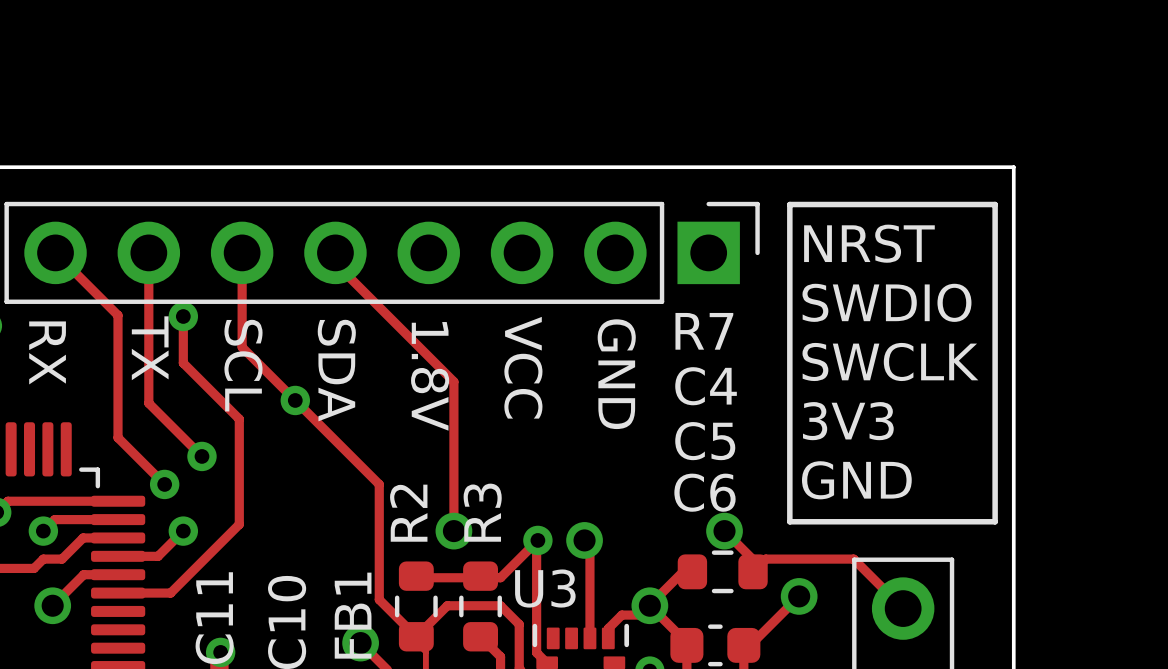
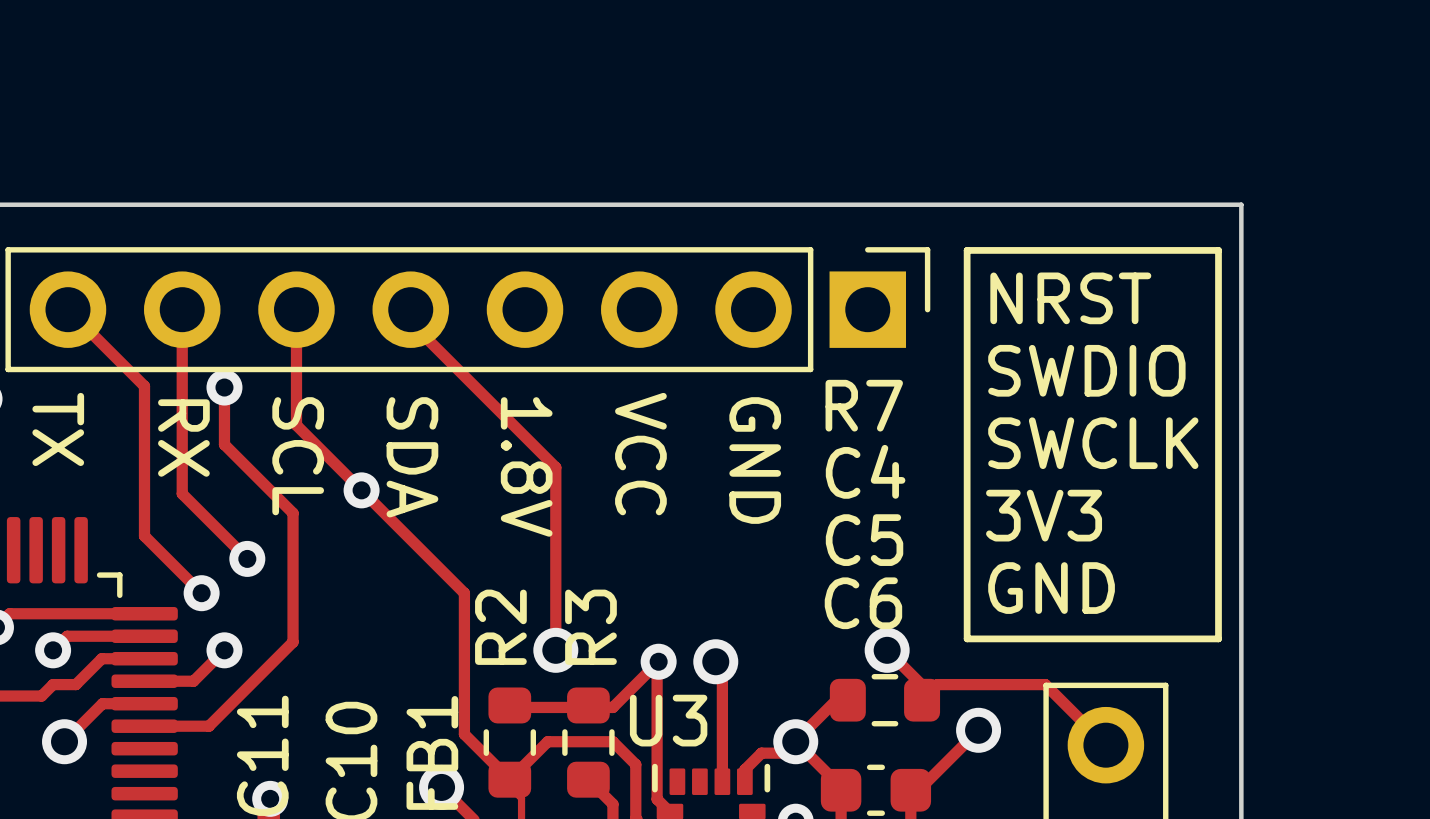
text: TX (150, 348) -> RX (183, 438)
text: RX (47, 352) -> TX (58, 429)

